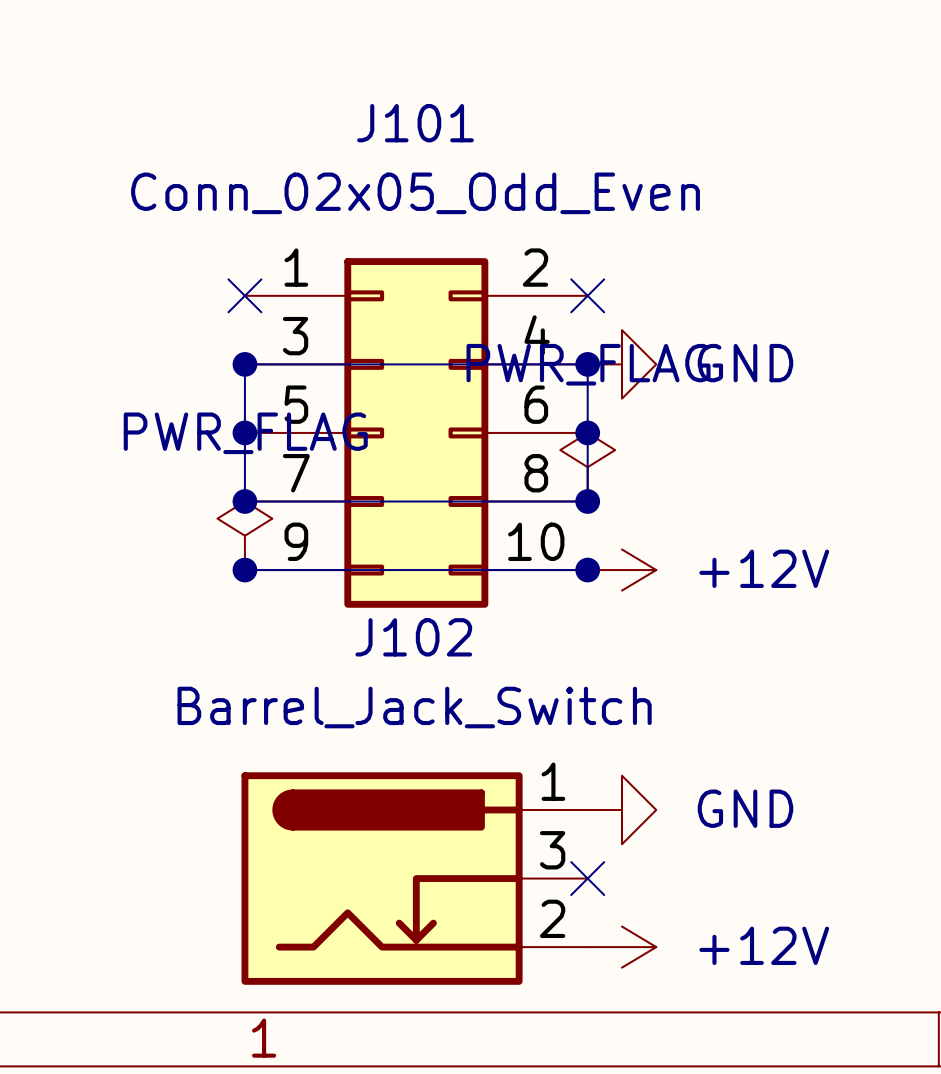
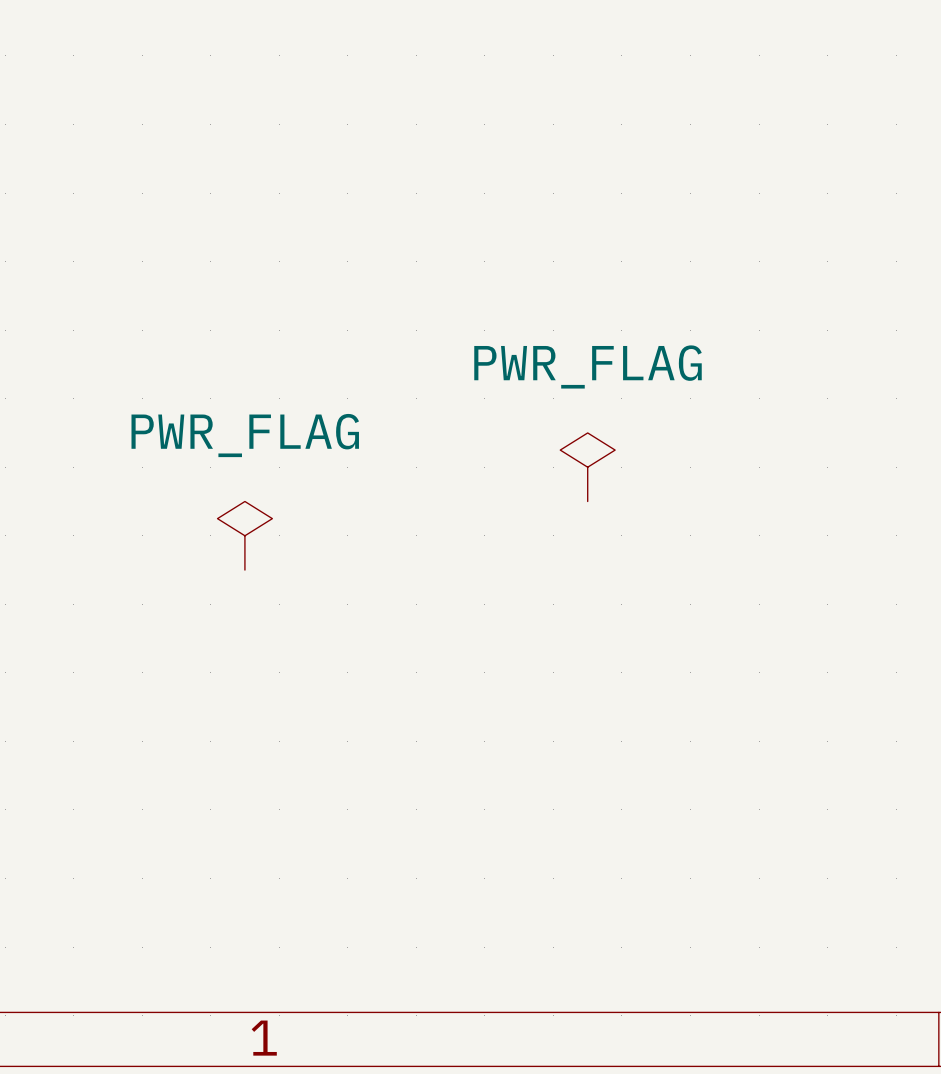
no-connect mark: (244, 295) -> none
no-connect mark: (587, 295) -> none
wire: (244, 364) (244, 501) (587, 501) (587, 364) (244, 364) -> none
junction: (244, 364) -> none
junction: (587, 364) -> none
power symbol: GND (621, 364) -> none
junction: (244, 432) -> none
J101: Conn_02x05_Odd_Even (416, 432) -> none
junction: (587, 432) -> none
junction: (244, 501) -> none
junction: (587, 501) -> none
wire: (244, 570) (587, 570) -> none
junction: (244, 570) -> none
junction: (587, 570) -> none
power symbol: +12V (621, 570) -> none
power symbol: GND (621, 809) -> none
J102: Barrel_Jack_Switch (414, 878) -> none
no-connect mark: (587, 878) -> none
power symbol: +12V (621, 947) -> none

